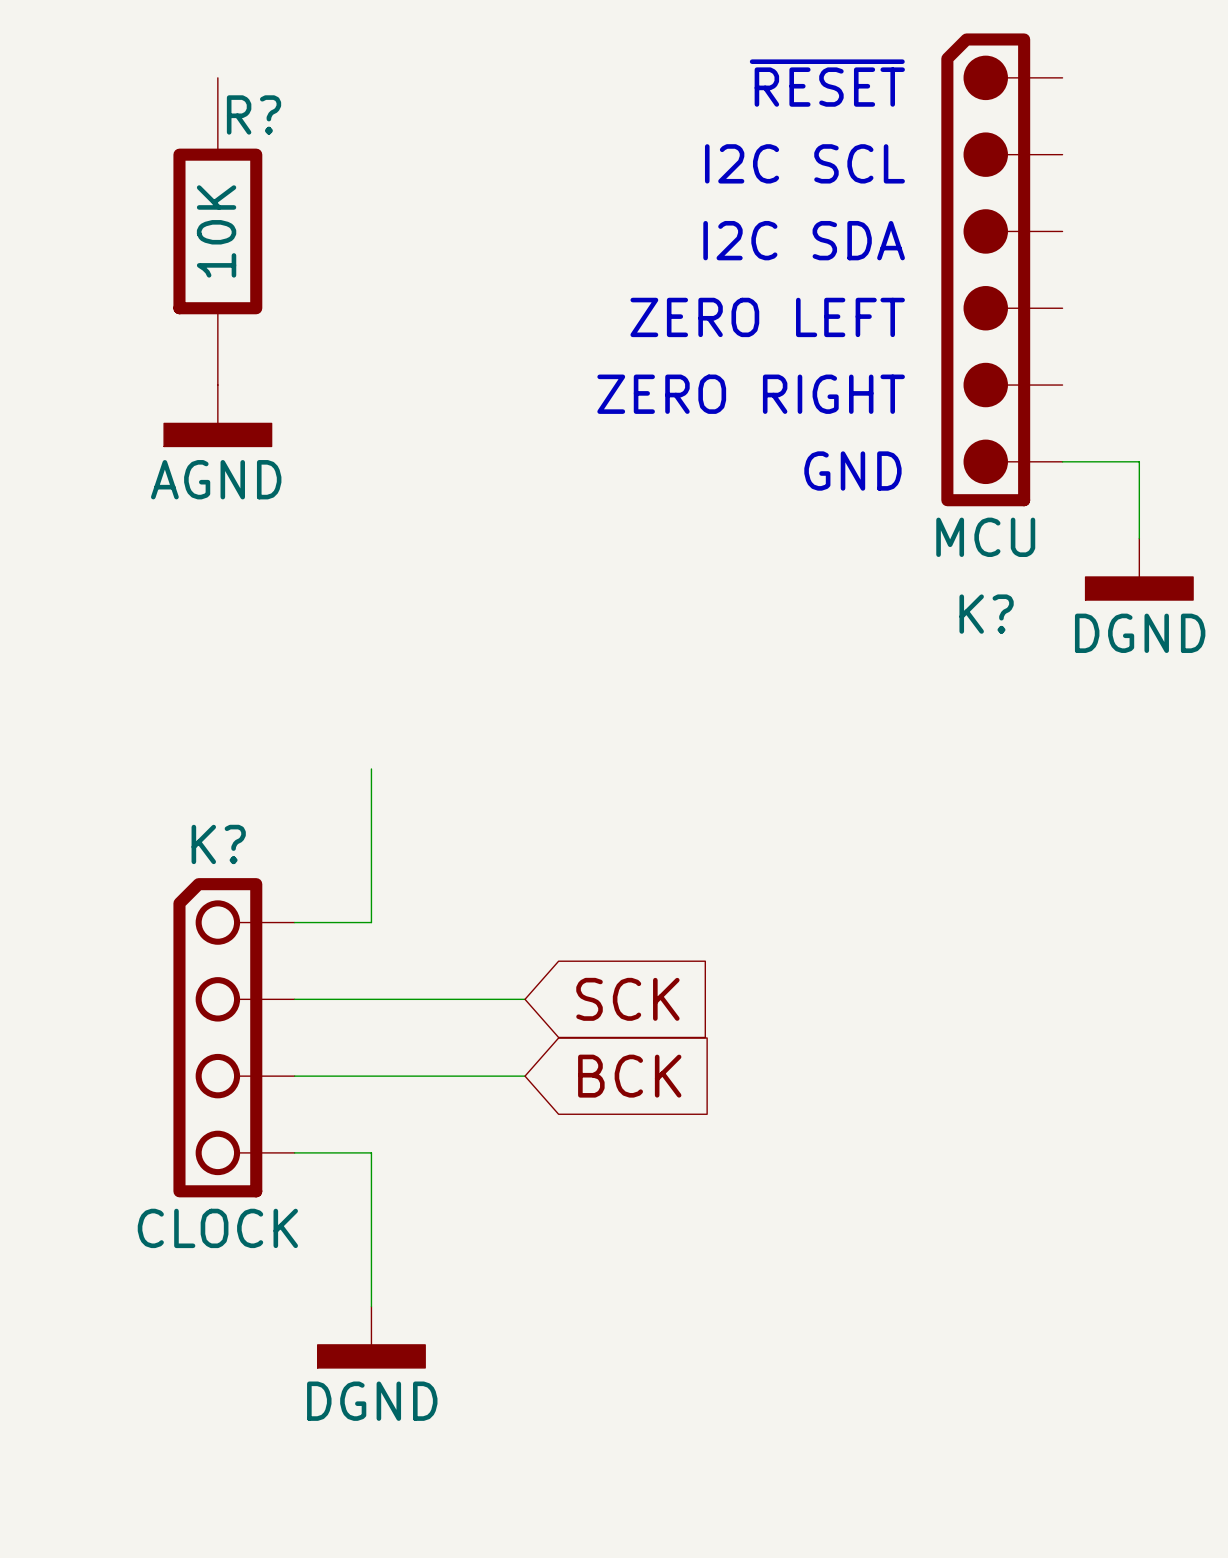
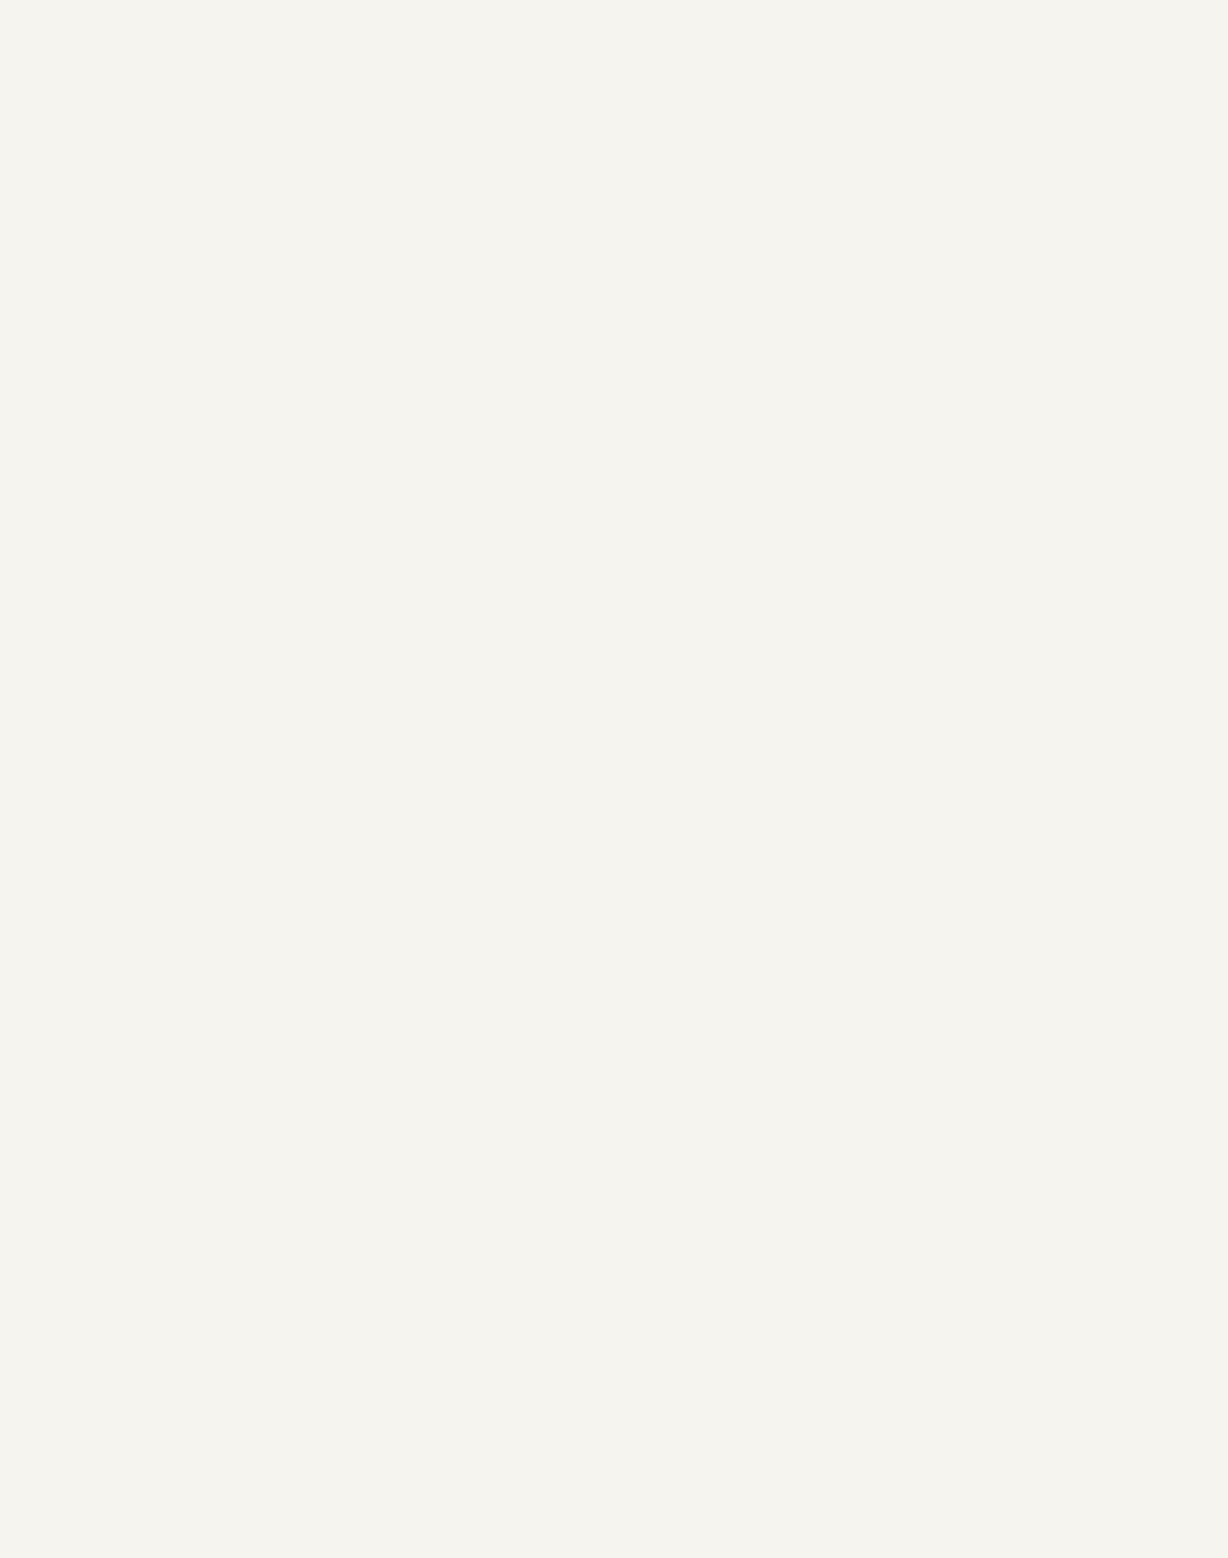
text: ~{RESET} (827, 83) -> none
text: I2C SCL (804, 163) -> none
R?: 10K (217, 231) -> none
text: I2C SDA (804, 240) -> none
K?: MCU (1001, 269) -> none
text: ZERO LEFT (767, 317) -> none
text: ZERO RIGHT (751, 394) -> none
power symbol: (217, 415) -> none
wire: (1062, 461) (1139, 461) (1139, 538) -> none
text: GND (852, 471) -> none
power symbol: (1139, 569) -> none
wire: (371, 768) (371, 922) (294, 922) -> none
wire: (294, 999) (525, 999) -> none
global label: SCK (627, 999) -> none
K?: CLOCK (234, 1037) -> none
wire: (294, 1076) (525, 1076) -> none
global label: BCK (629, 1076) -> none
wire: (294, 1152) (371, 1152) (371, 1306) -> none
power symbol: (371, 1337) -> none

